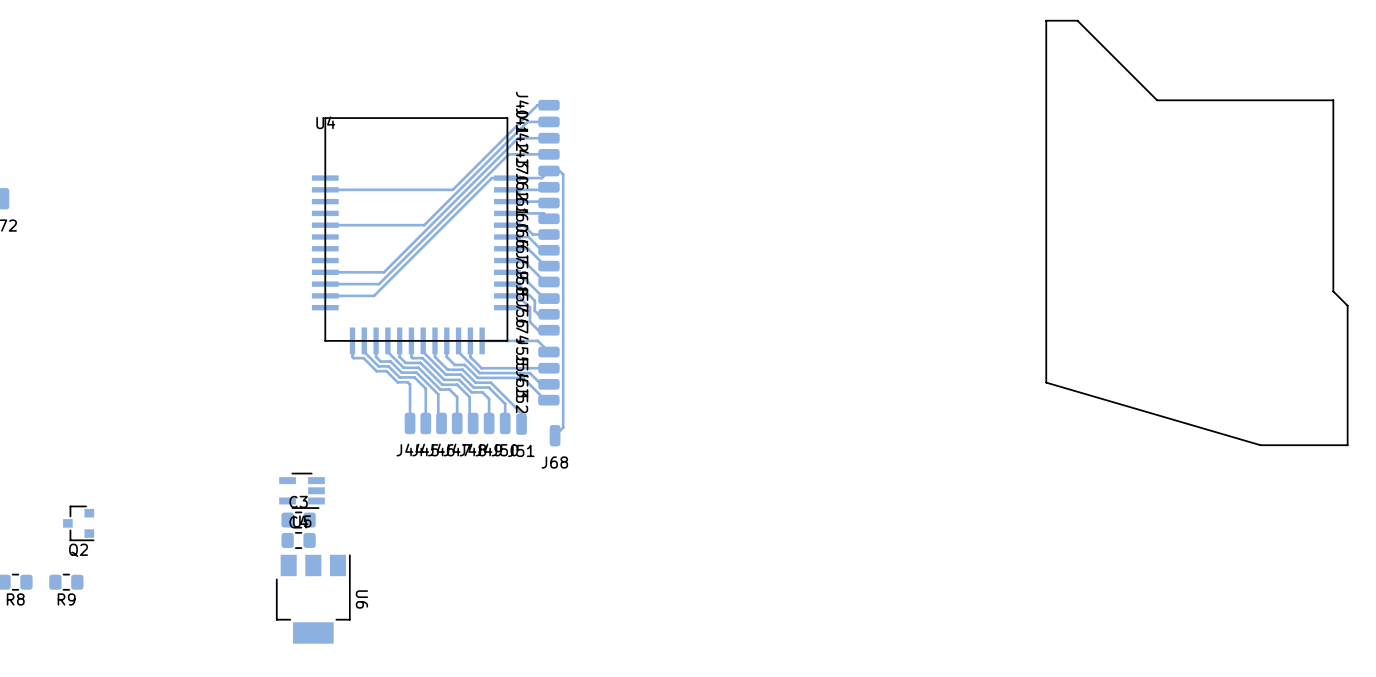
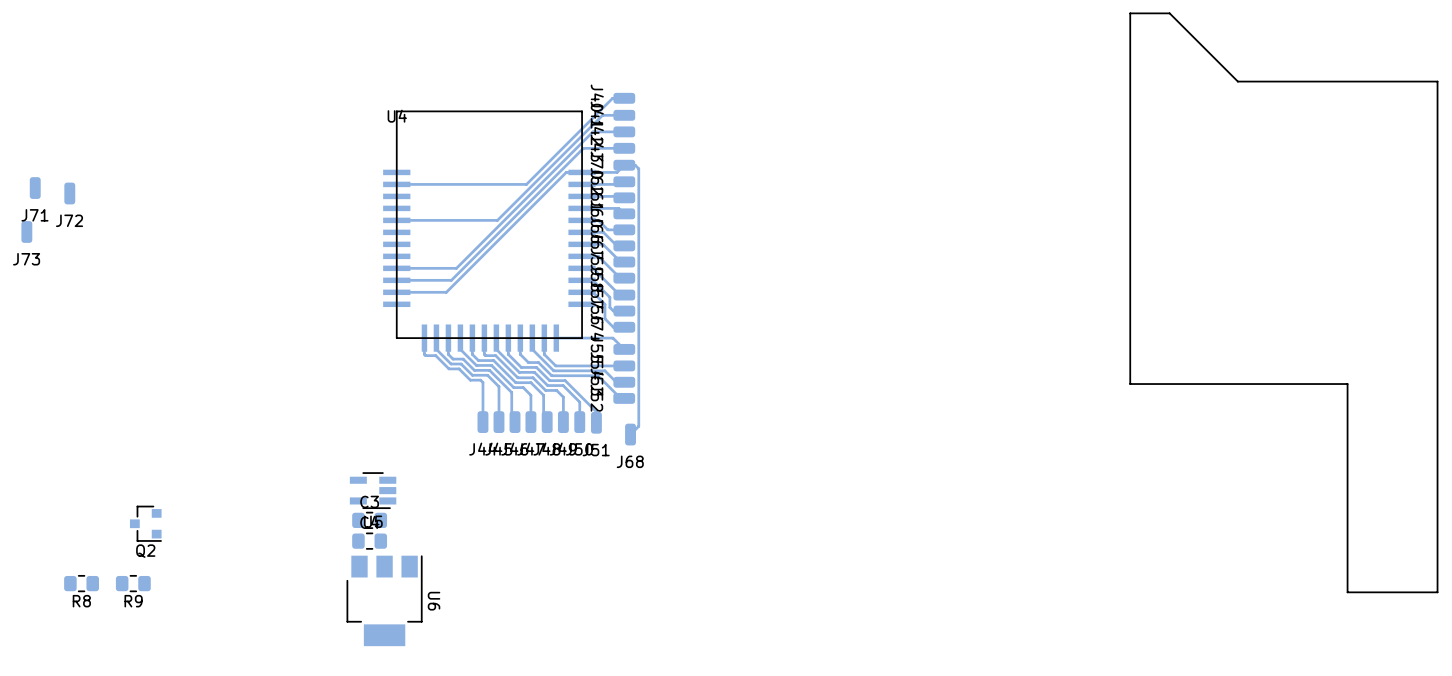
board edge: (1046, 21) (1077, 20) (1157, 100) (1333, 100) (1333, 291) (1347, 305) (1347, 445) (1260, 445) (1046, 382) -> (1130, 13) (1169, 13) (1237, 81) (1437, 81) (1437, 592) (1347, 592) (1347, 384) (1130, 384) (1130, 380)

